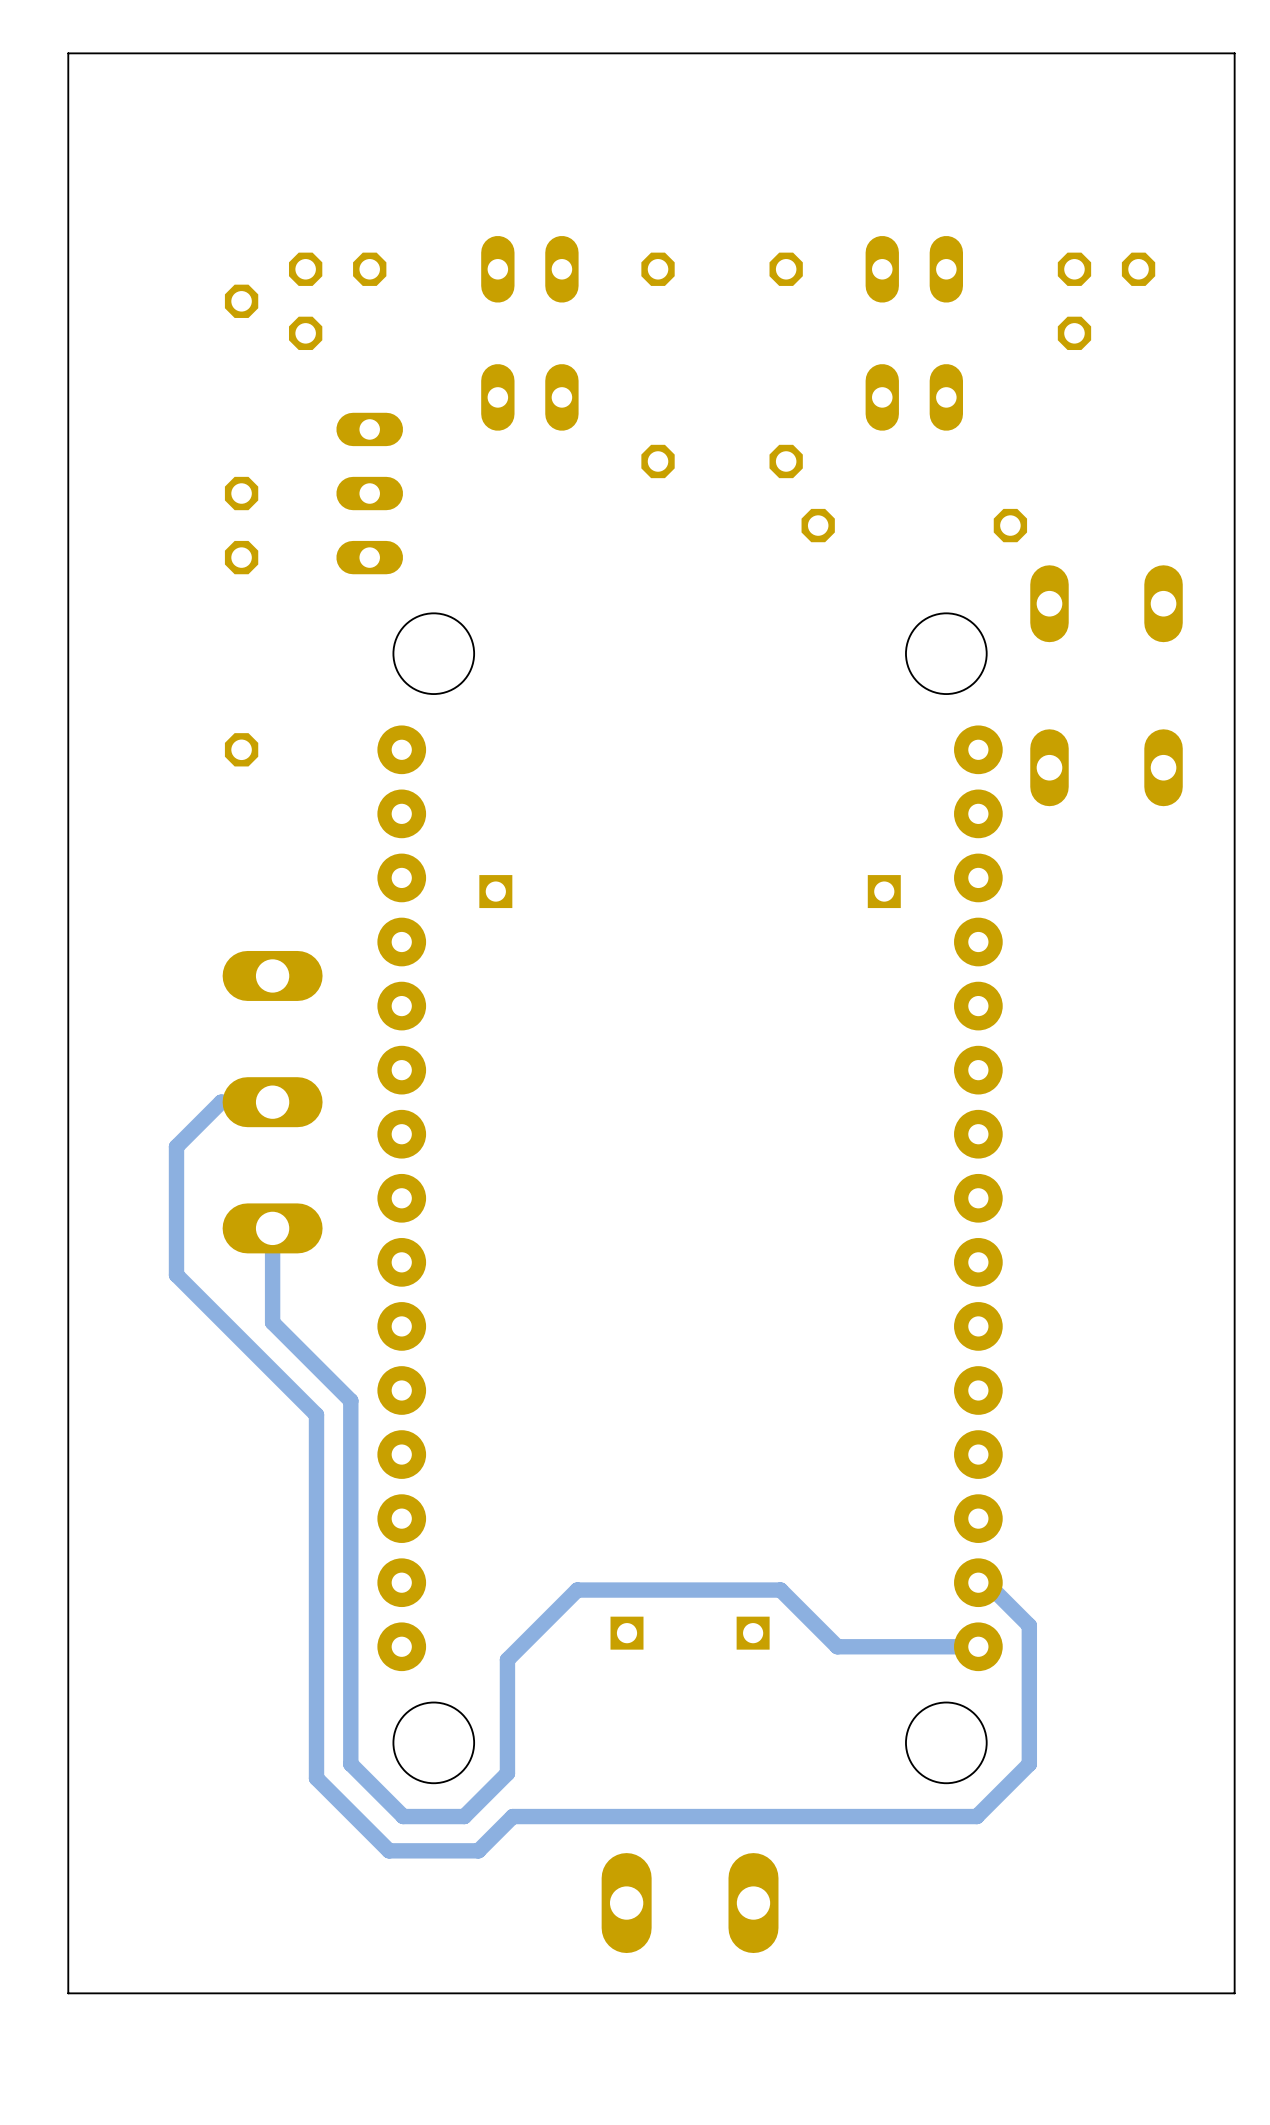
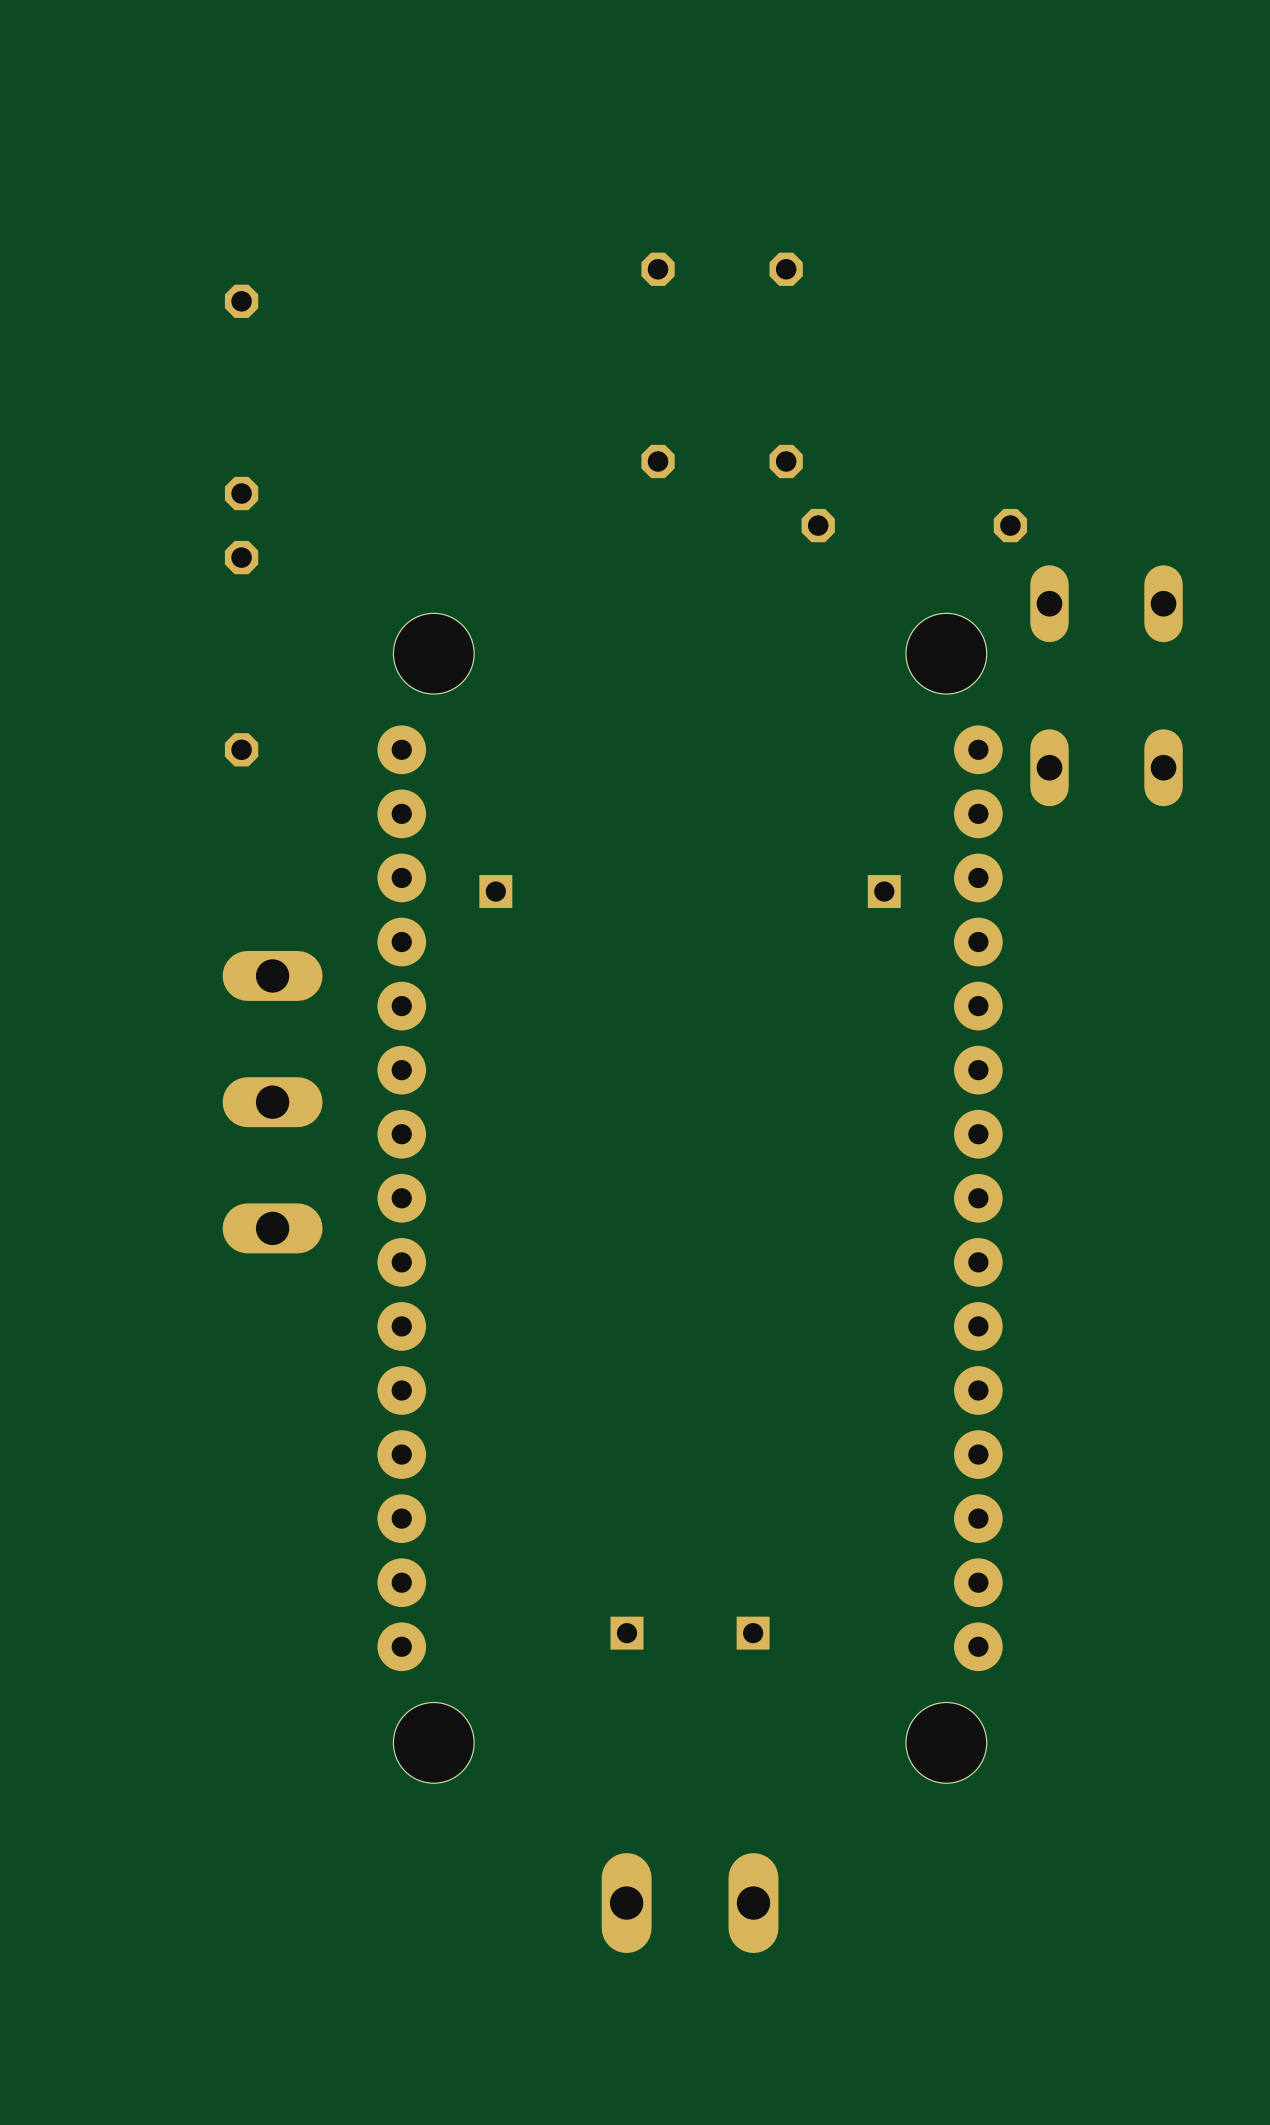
board edge: (1234, 53) (68, 53) (68, 1993) (1234, 1993) (1234, 53) -> none
part: (529, 269) -> none
part: (914, 269) -> none
part: (337, 301) -> none
part: (1106, 301) -> none
part: (529, 397) -> none
part: (914, 397) -> none
part: (369, 493) -> none
track: (272, 1102) (221, 1102) (176, 1146) (176, 1274) (316, 1414) (316, 1778) (389, 1850) (478, 1850) (512, 1816) (976, 1816) (1029, 1764) (1029, 1625) (993, 1590) (985, 1590) (978, 1582) -> none
track: (272, 1228) (272, 1322) (350, 1400) (350, 1764) (403, 1816) (464, 1816) (507, 1773) (507, 1659) (577, 1590) (780, 1590) (837, 1646) (978, 1646) -> none

